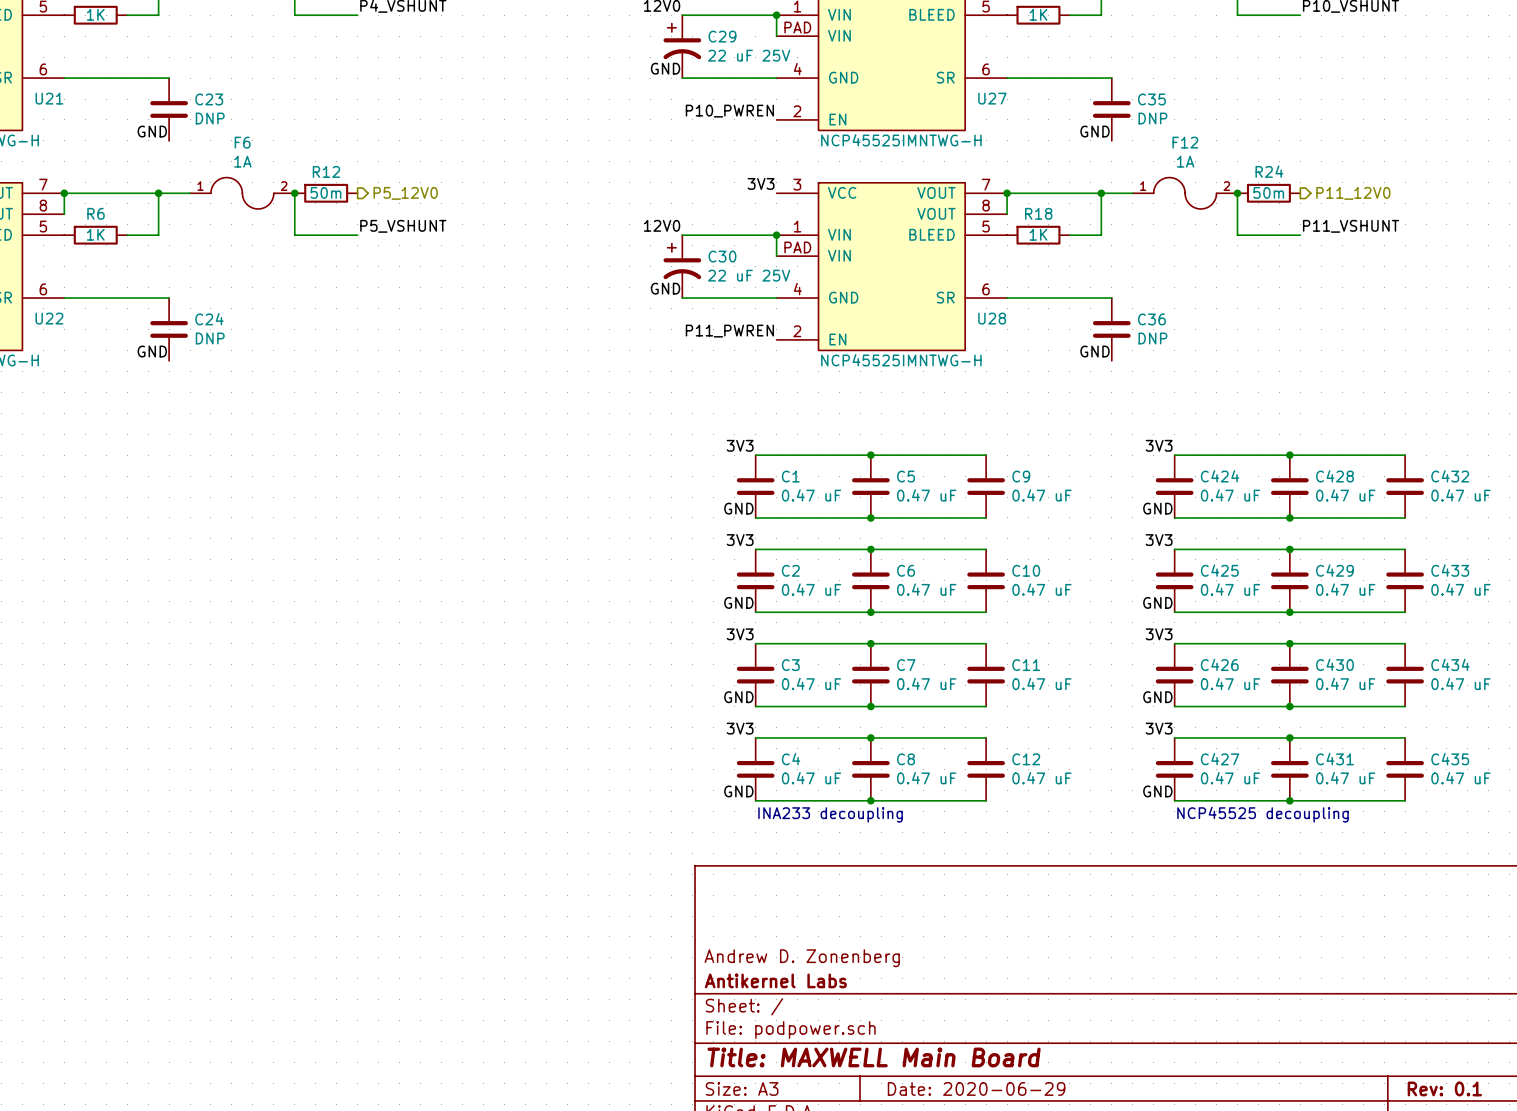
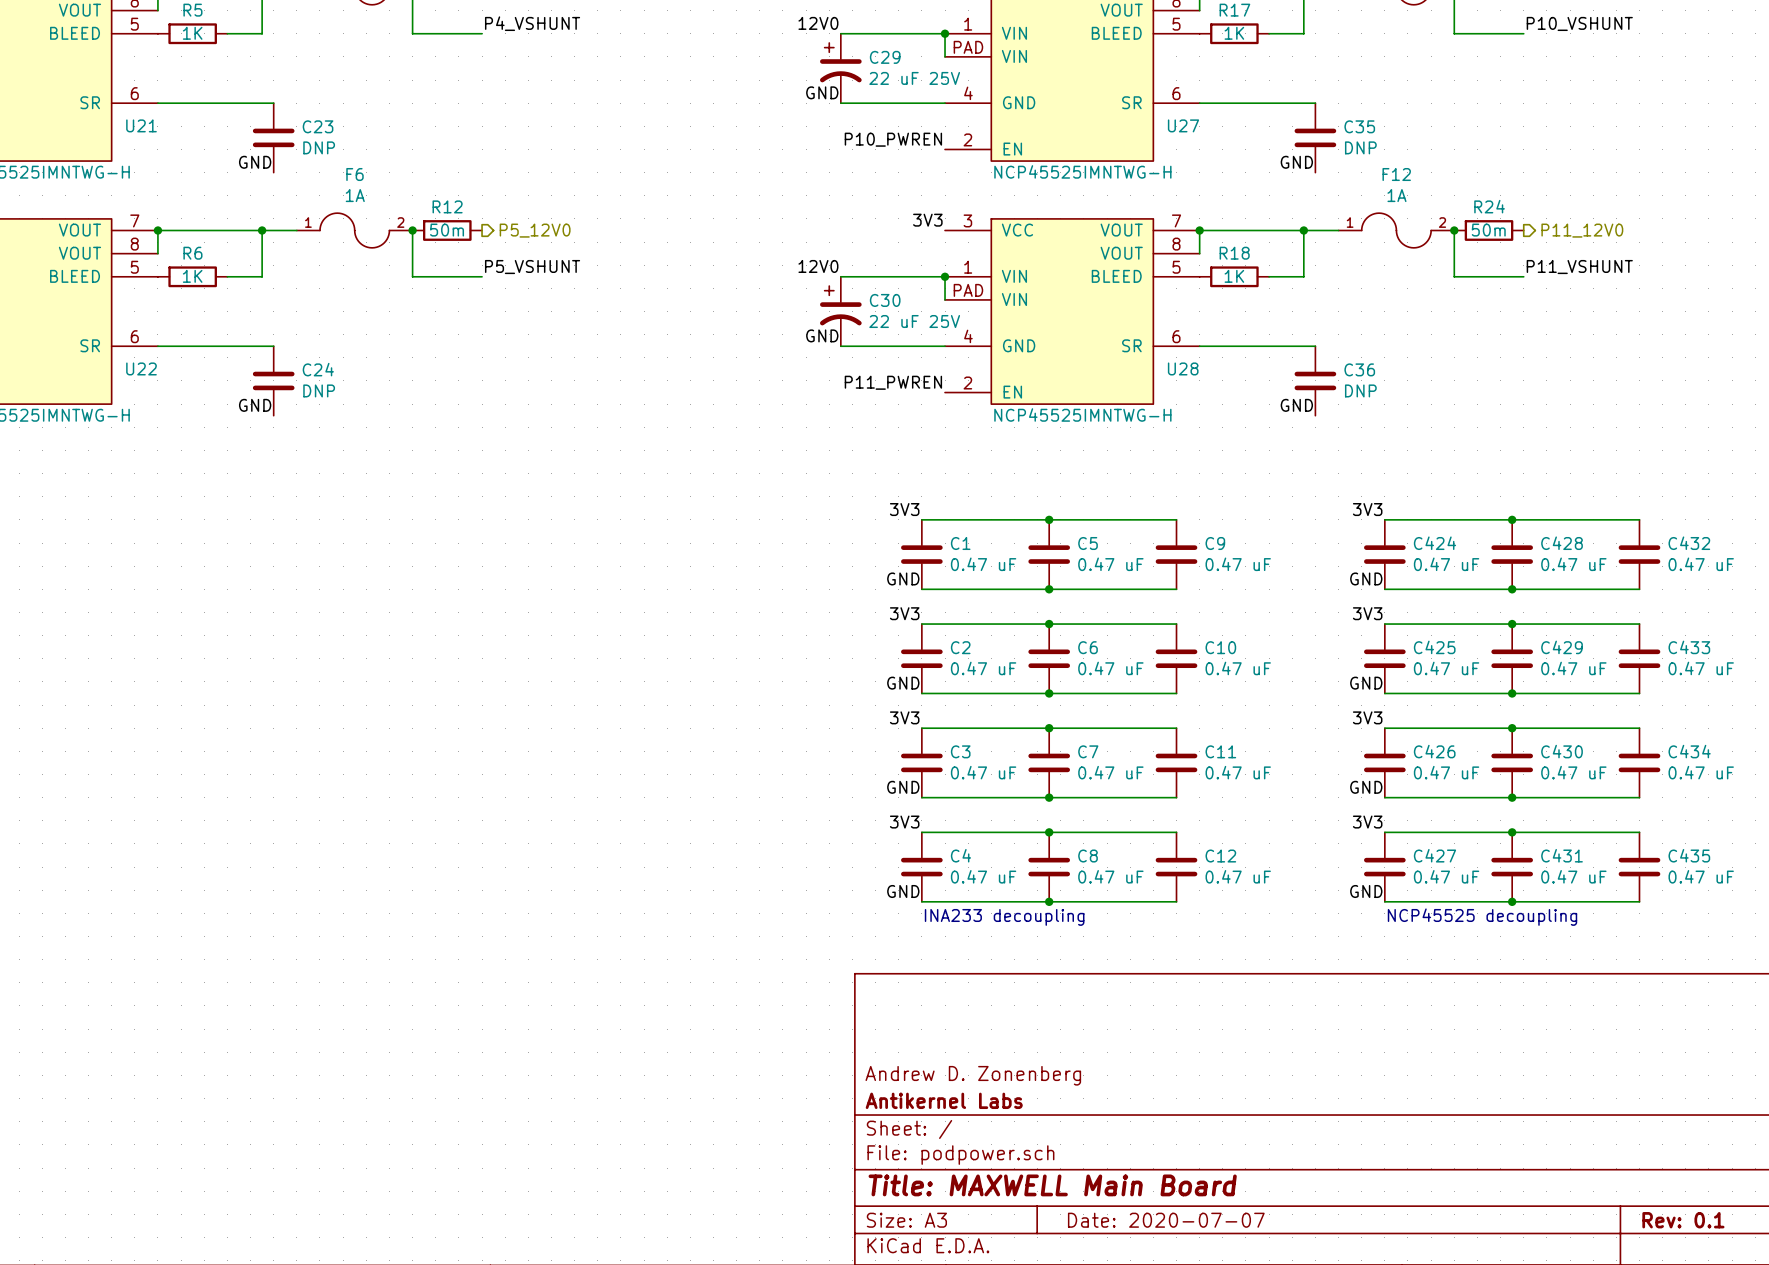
title block: Date: 2020-06-29 (976, 1088) -> Date: 2020-07-07 (1166, 1220)

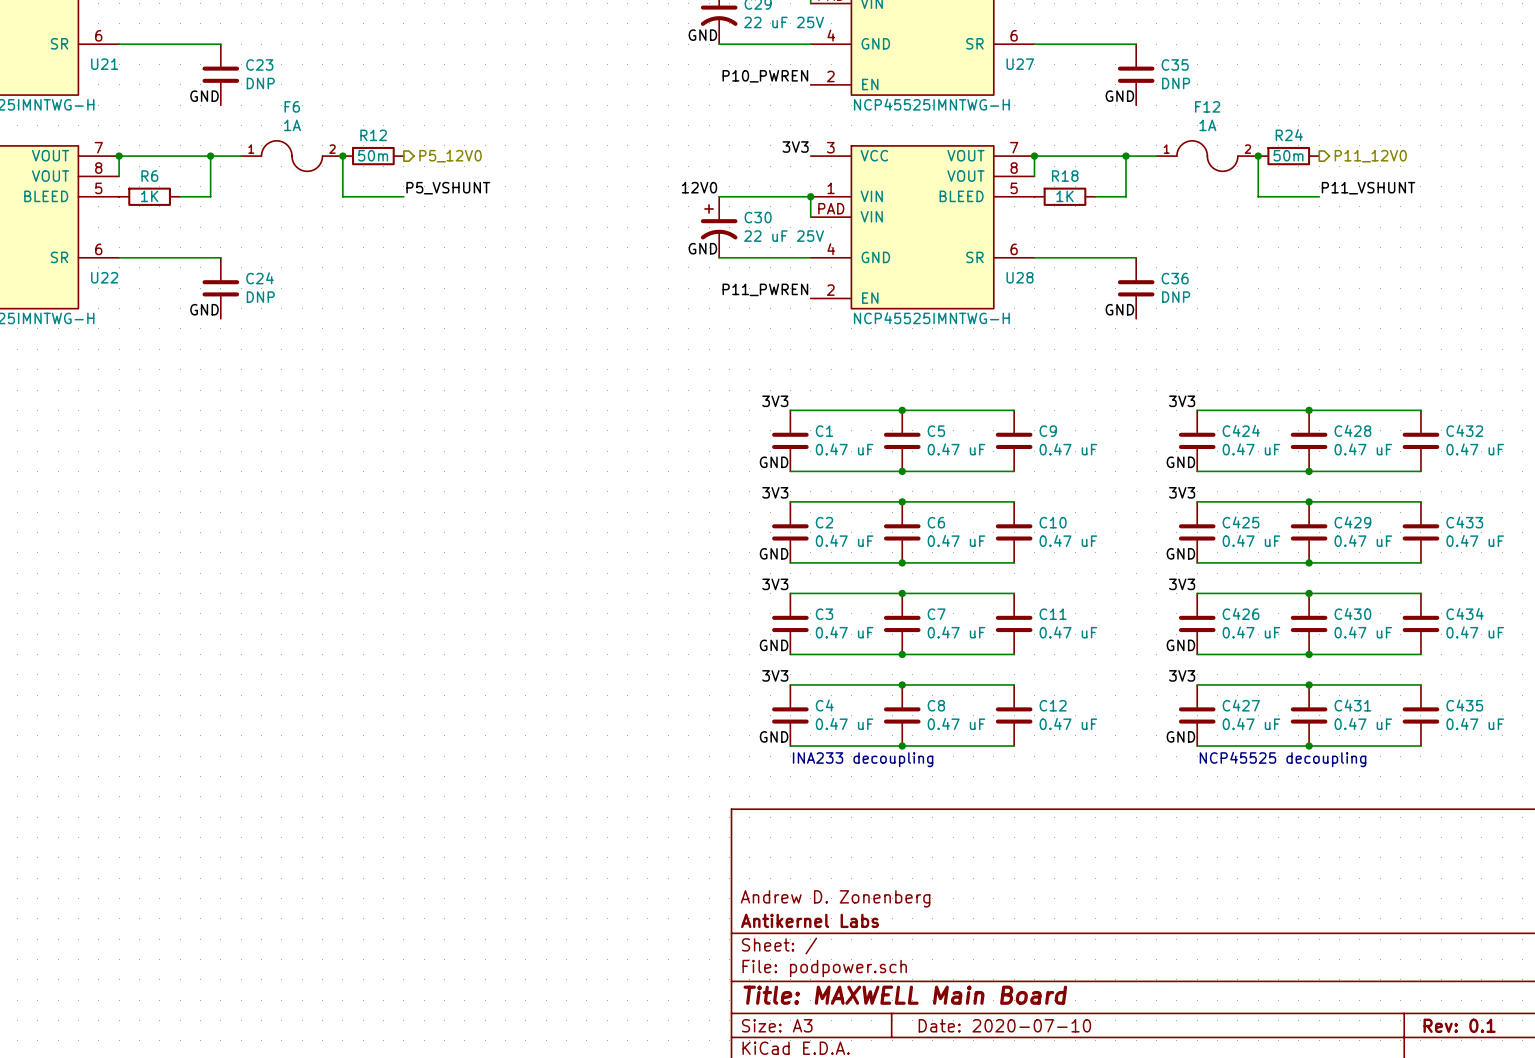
title block: Date: 2020-07-07 (1166, 1220) -> Date: 2020-07-10 (1004, 1025)

